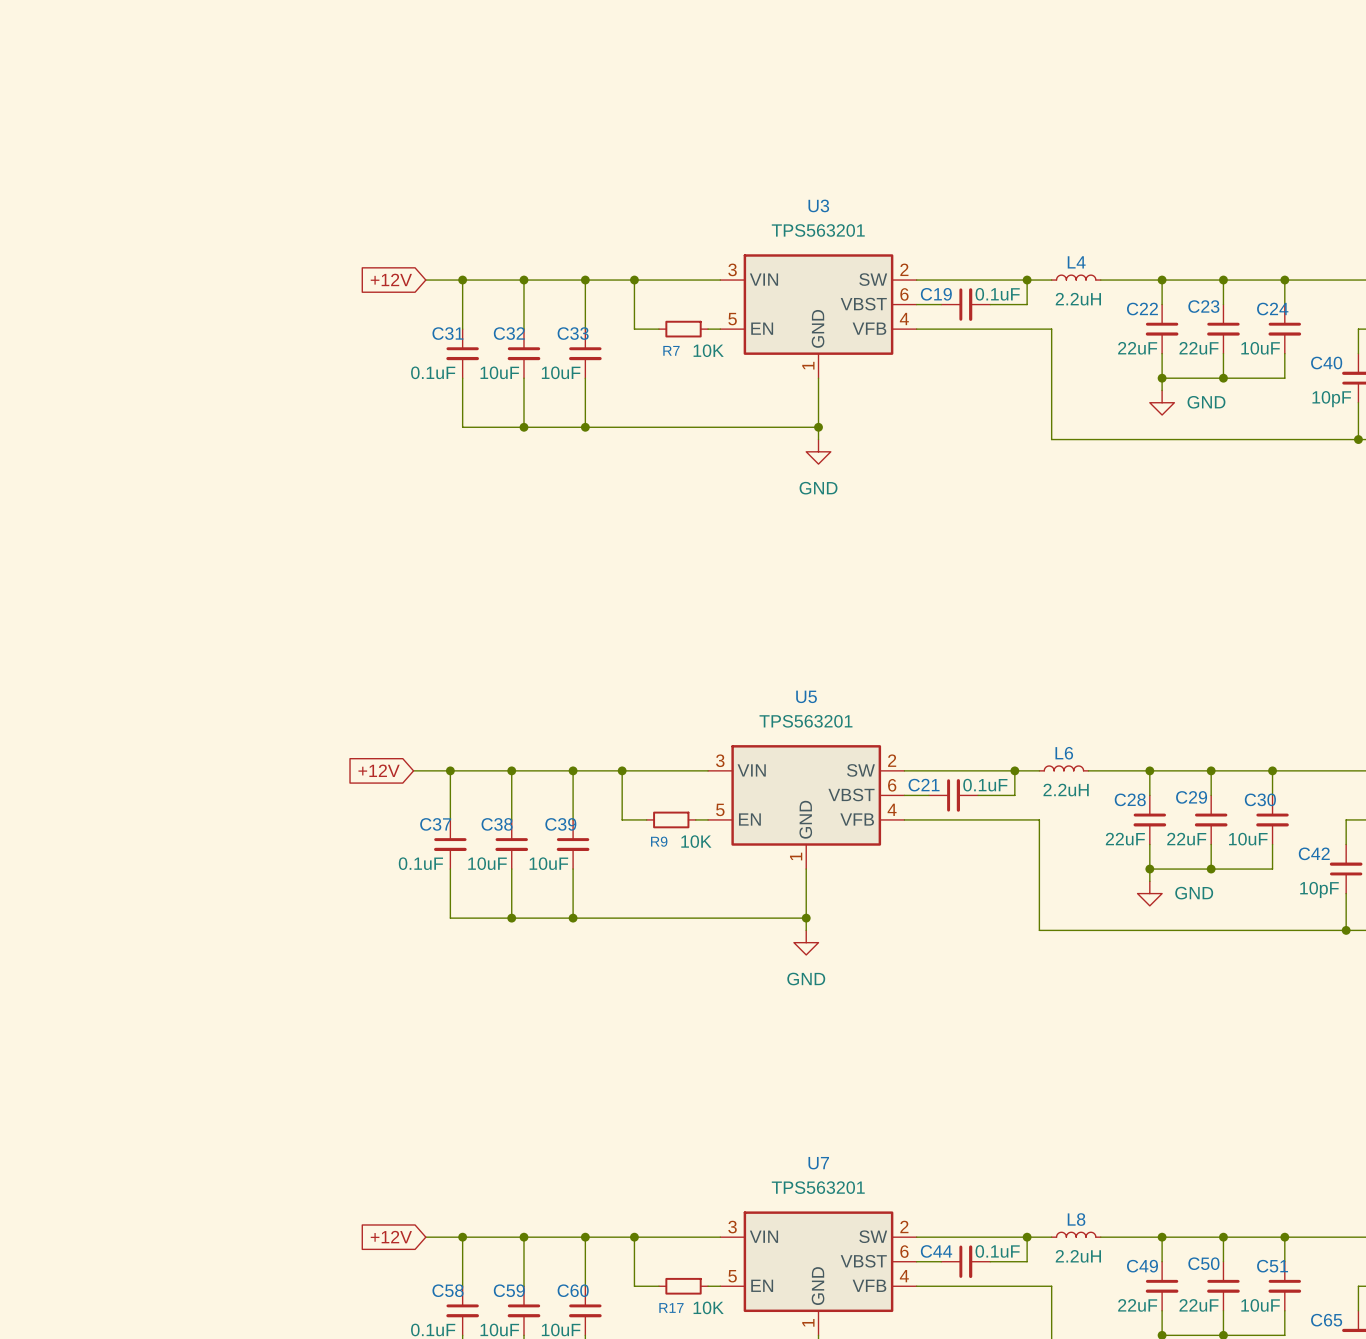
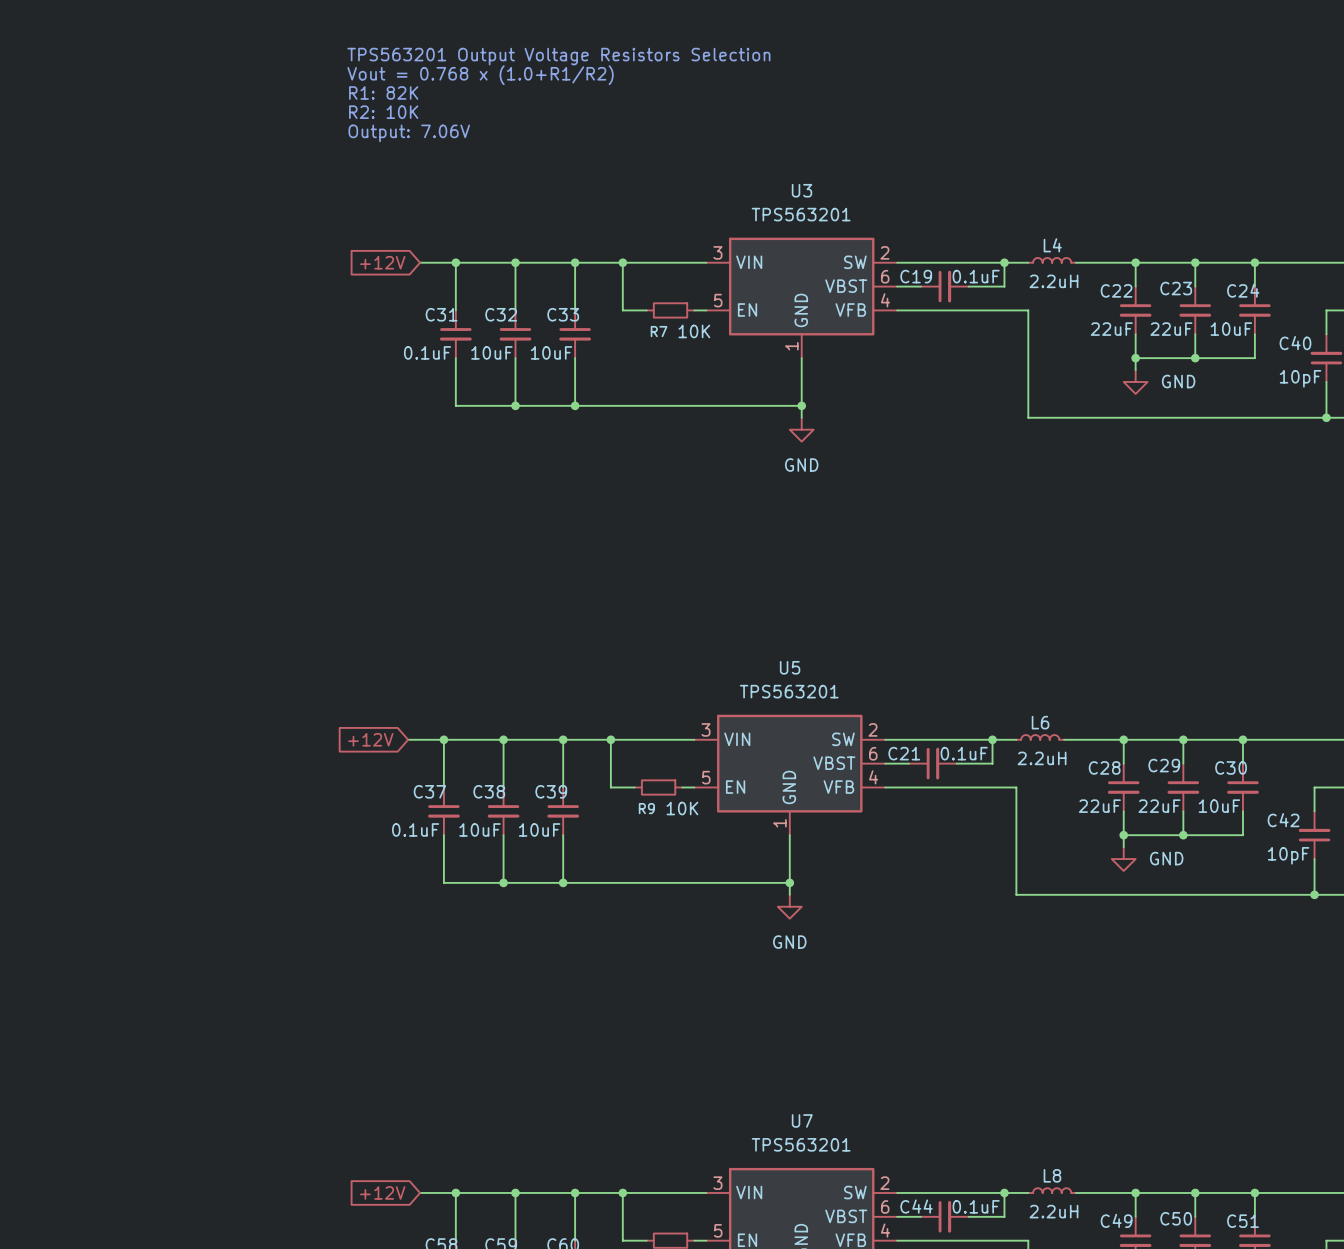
text: none -> TPS563201 Output Voltage Resistors Selection (558, 56)
text: none -> Vout = 0.768 x (1.0+R1/R2) (480, 75)
text: none -> R1: 82K (383, 92)
text: none -> R2: 10K (383, 112)
text: none -> Output: 7.06V (409, 133)

